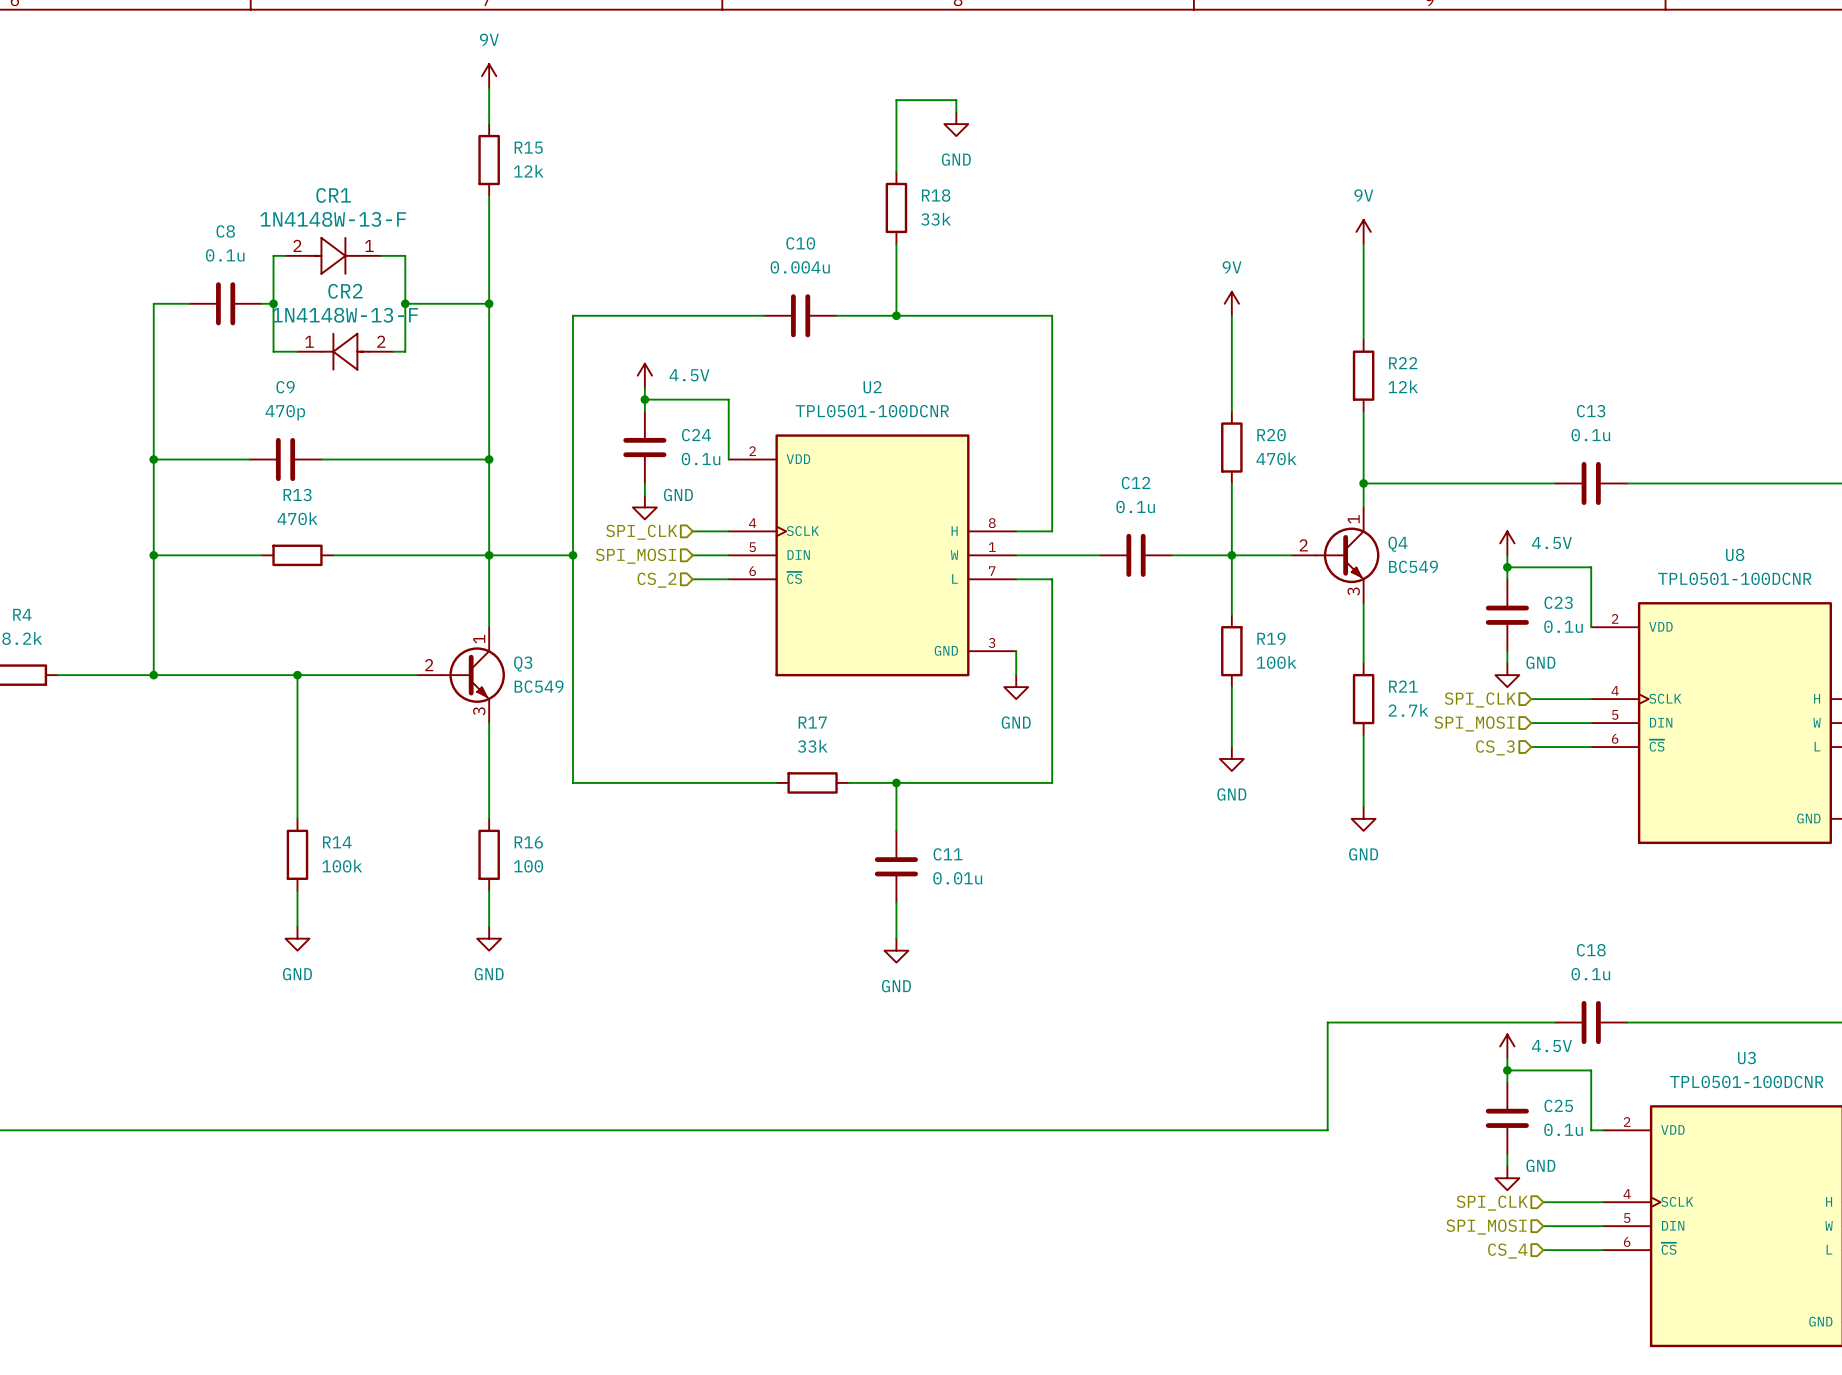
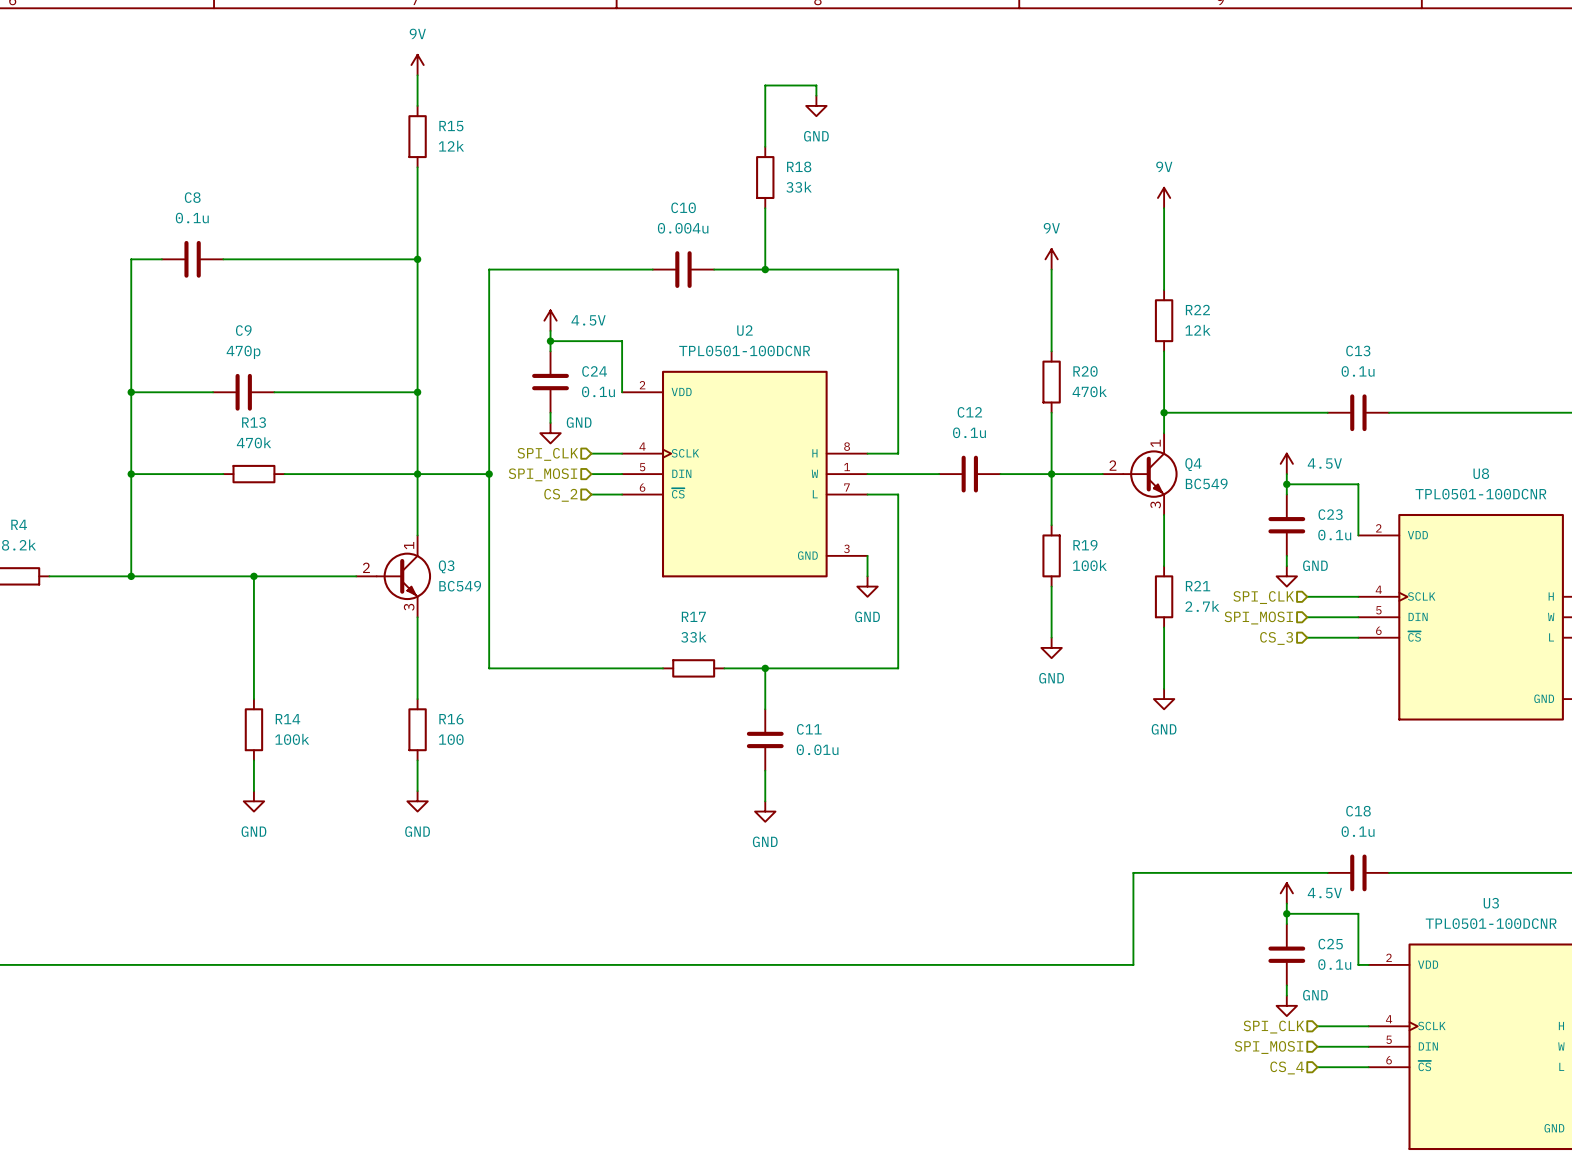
wire: (285, 255) (273, 255) (273, 351) (297, 351) -> none
CR1: 1N4148W-13-F (333, 255) -> none
wire: (381, 255) (405, 255) (405, 351) (393, 351) -> none
wire: none -> (233, 259) (345, 259)
junction: (273, 303) -> none
junction: (405, 303) -> none
CR2: 1N4148W-13-F (345, 351) -> none

